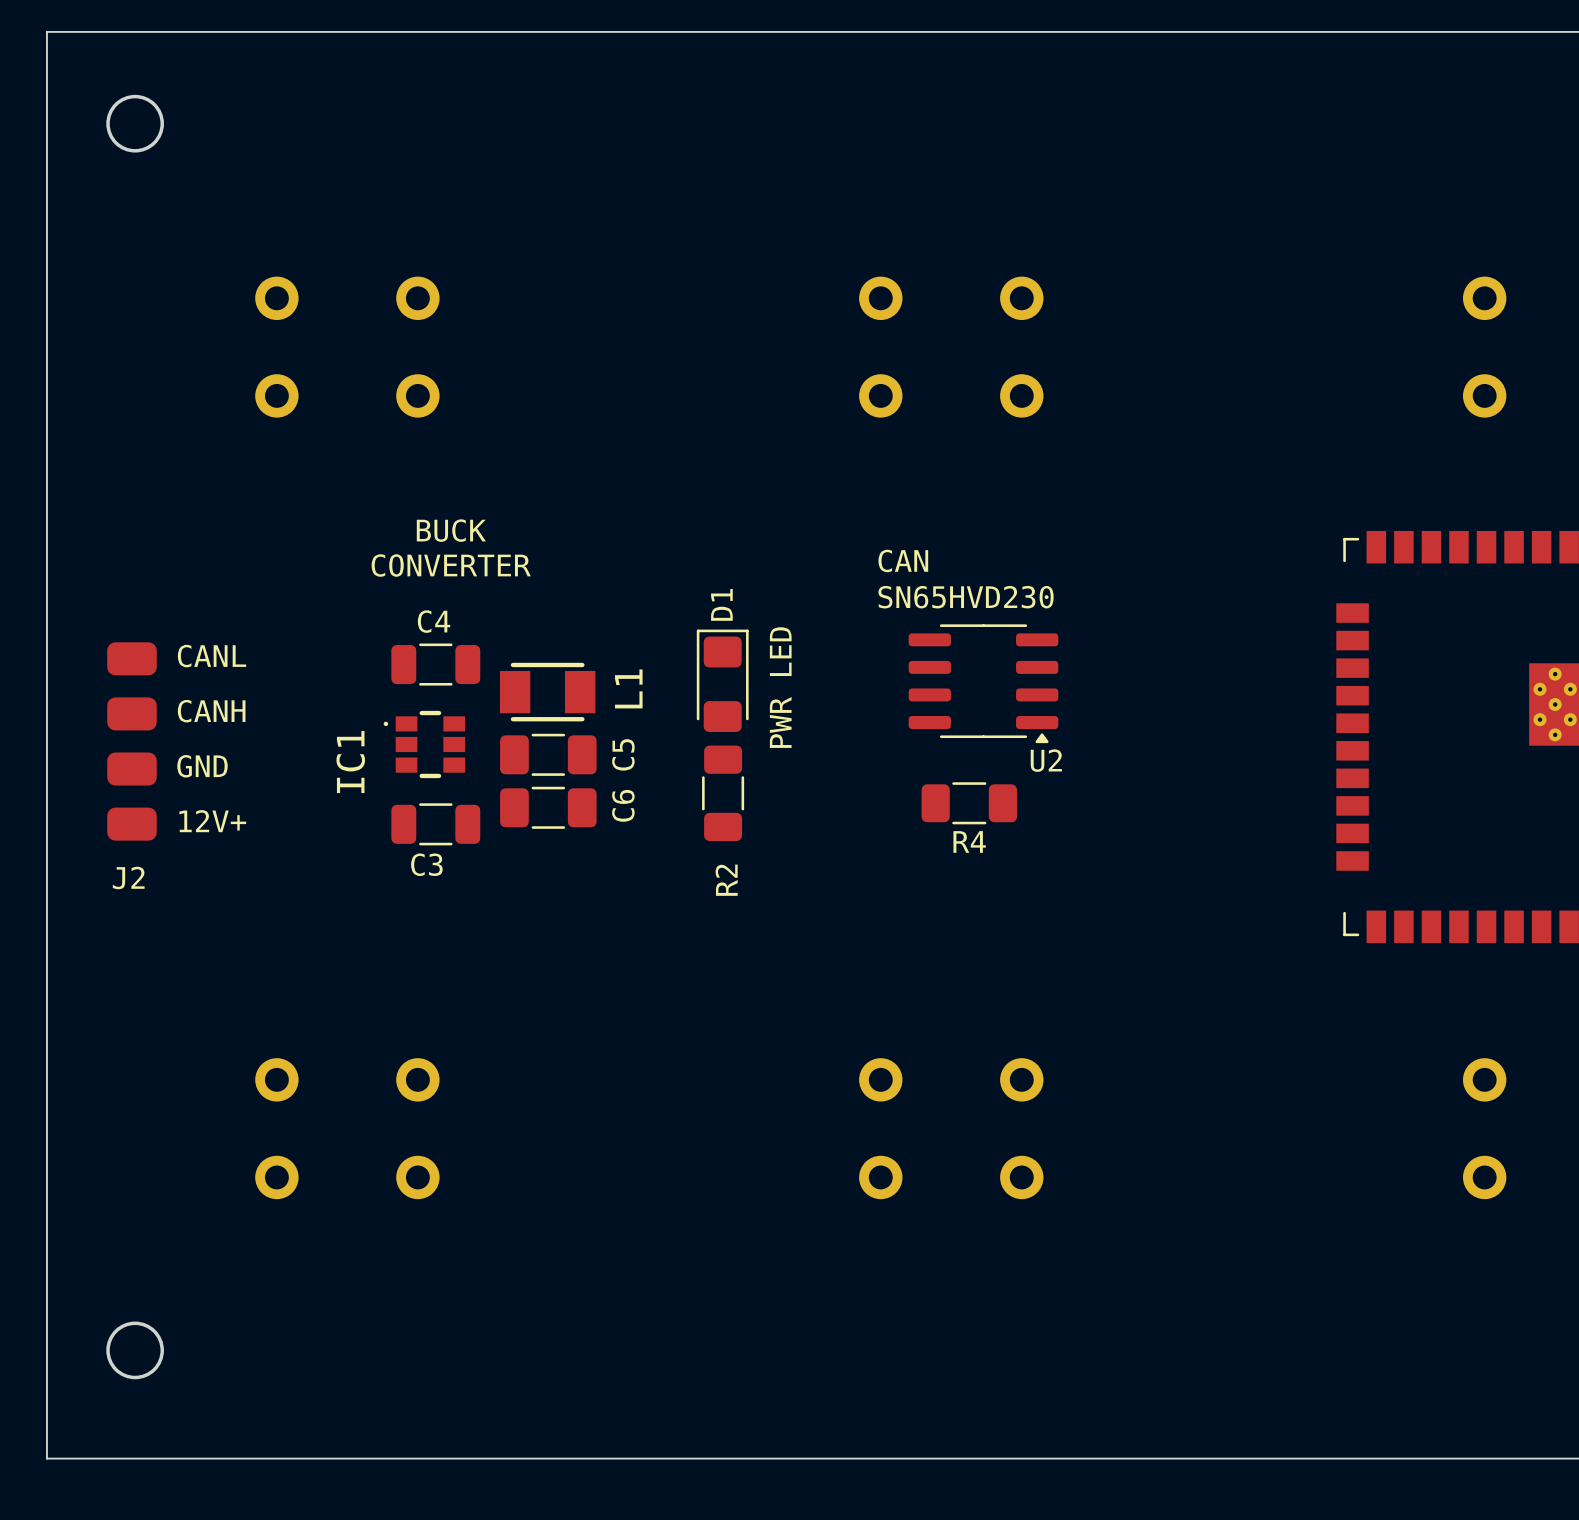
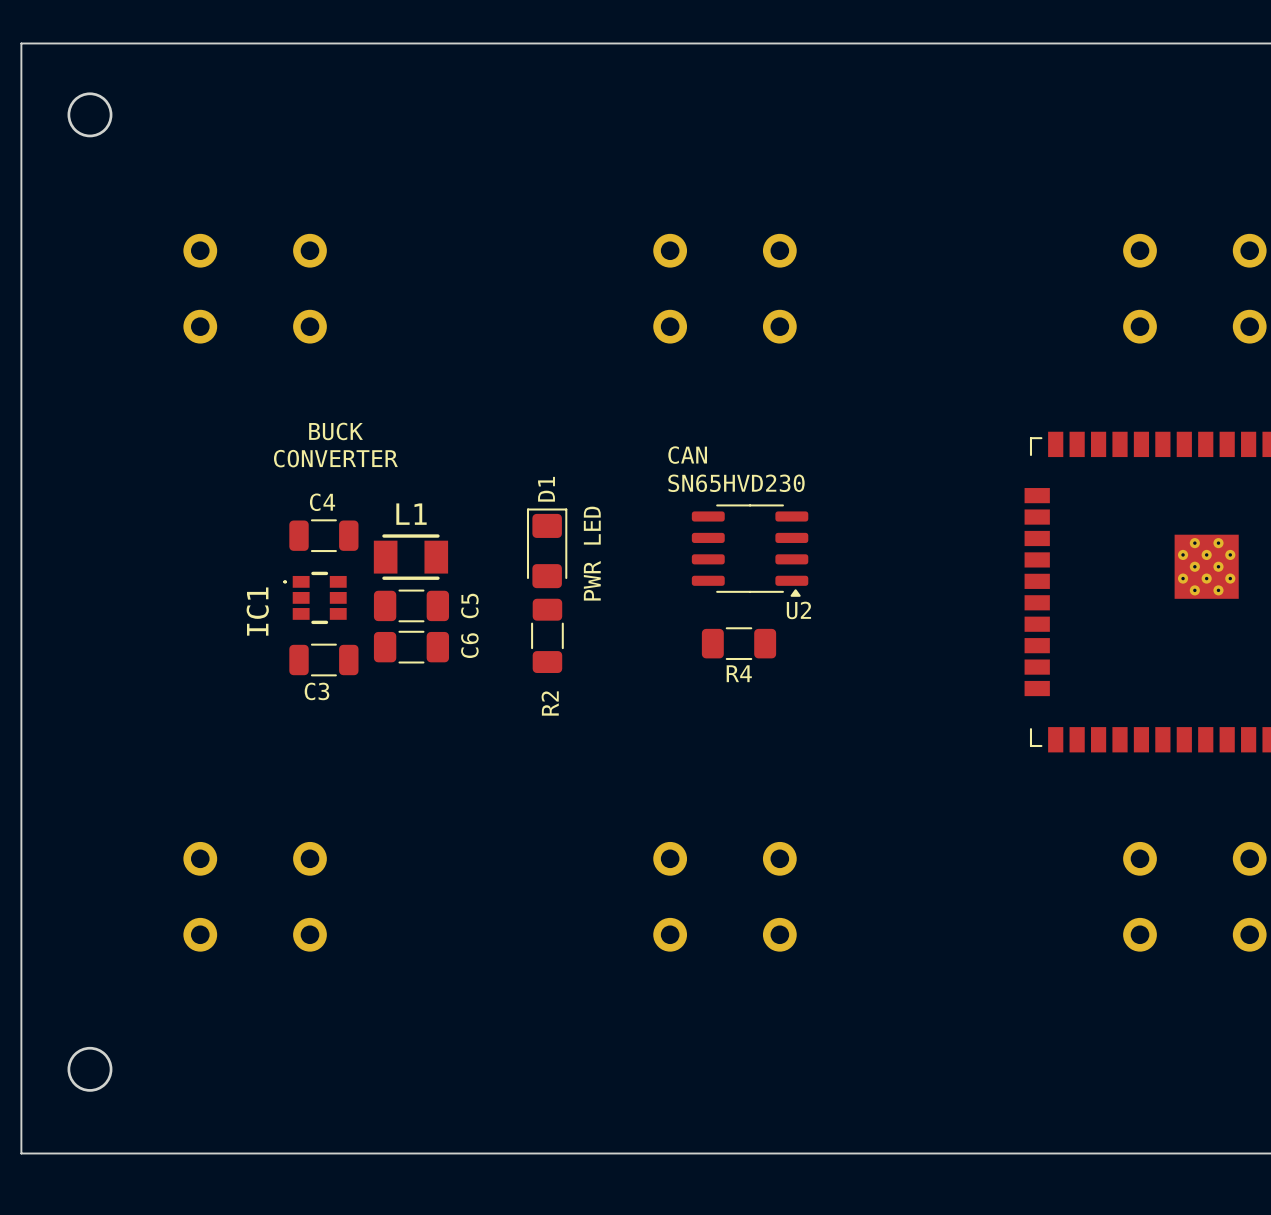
L1 name rotation: 0° (628, 688) -> 90° clockwise (411, 514)
L1 name position: L1 (628, 688) -> L1 (411, 514)
J2: (131, 741) -> none

